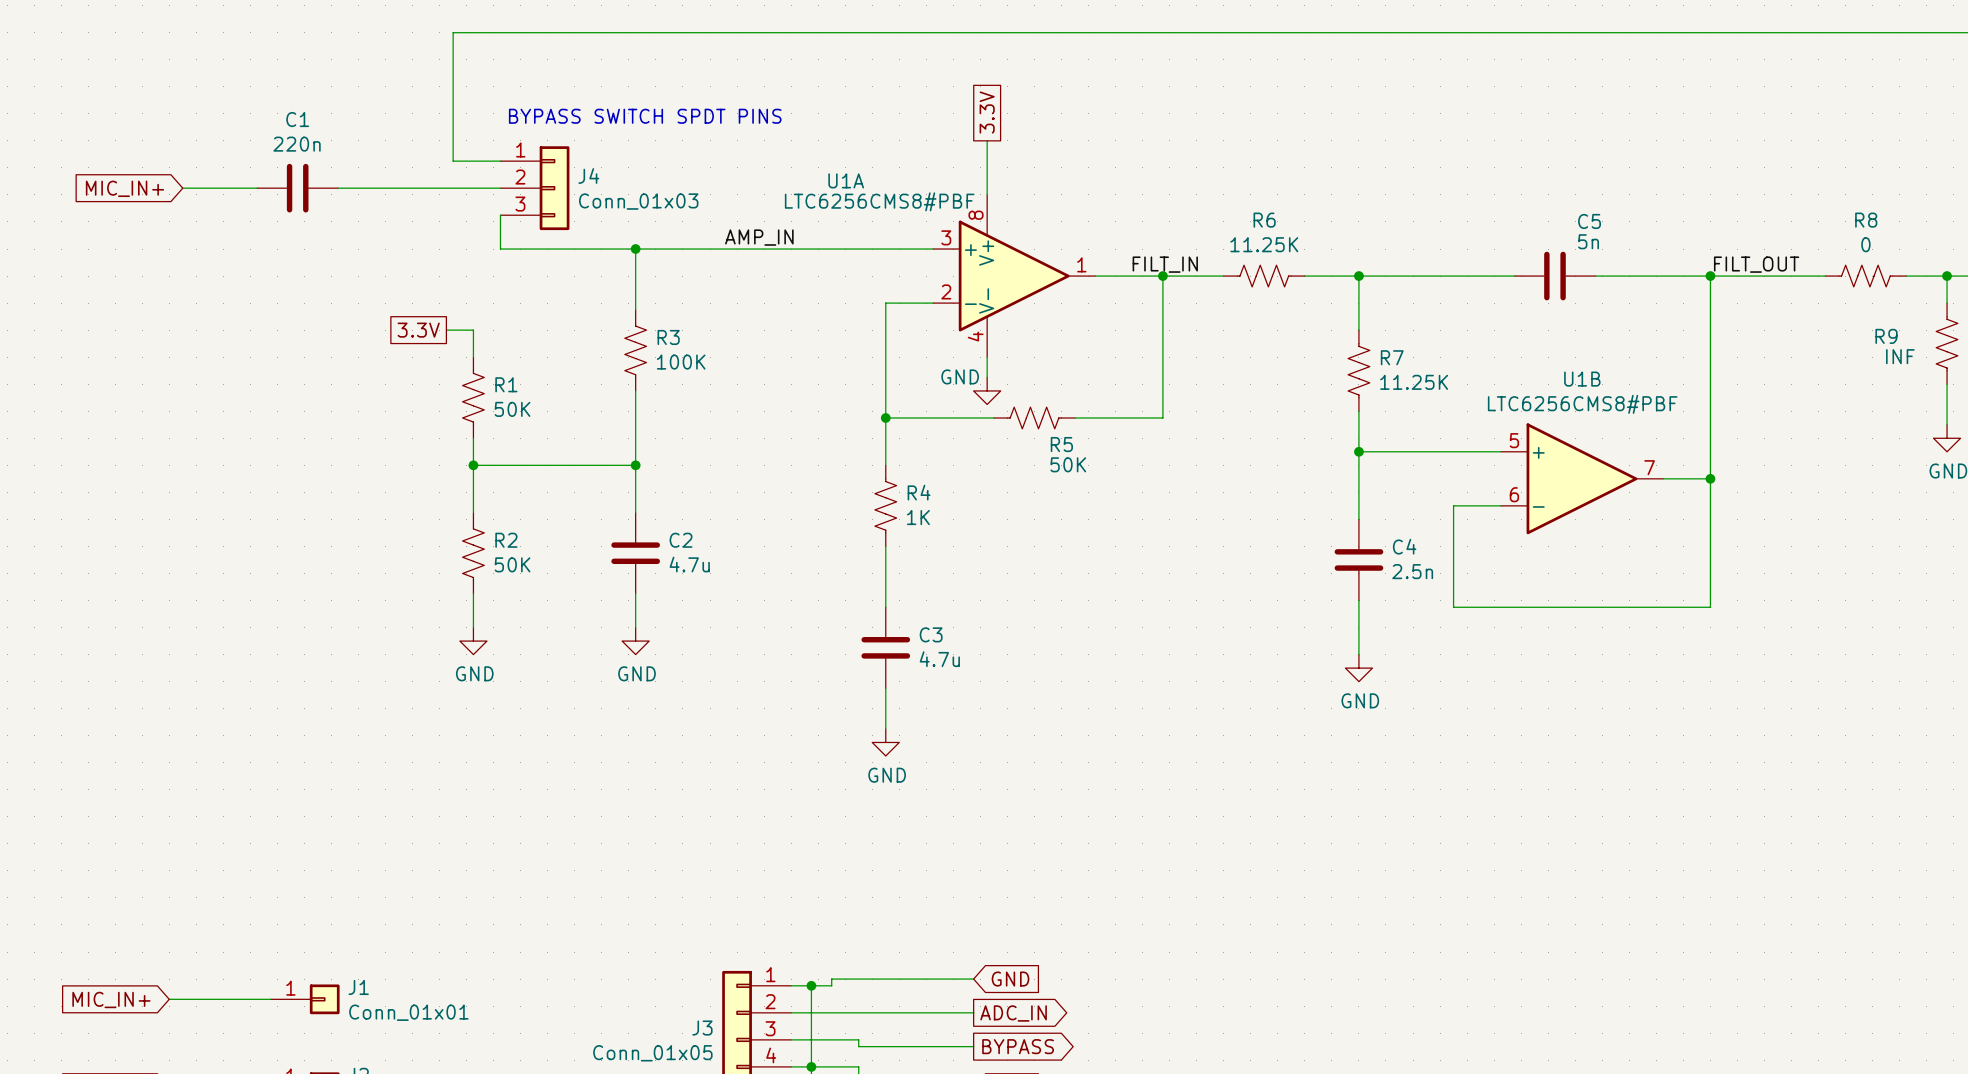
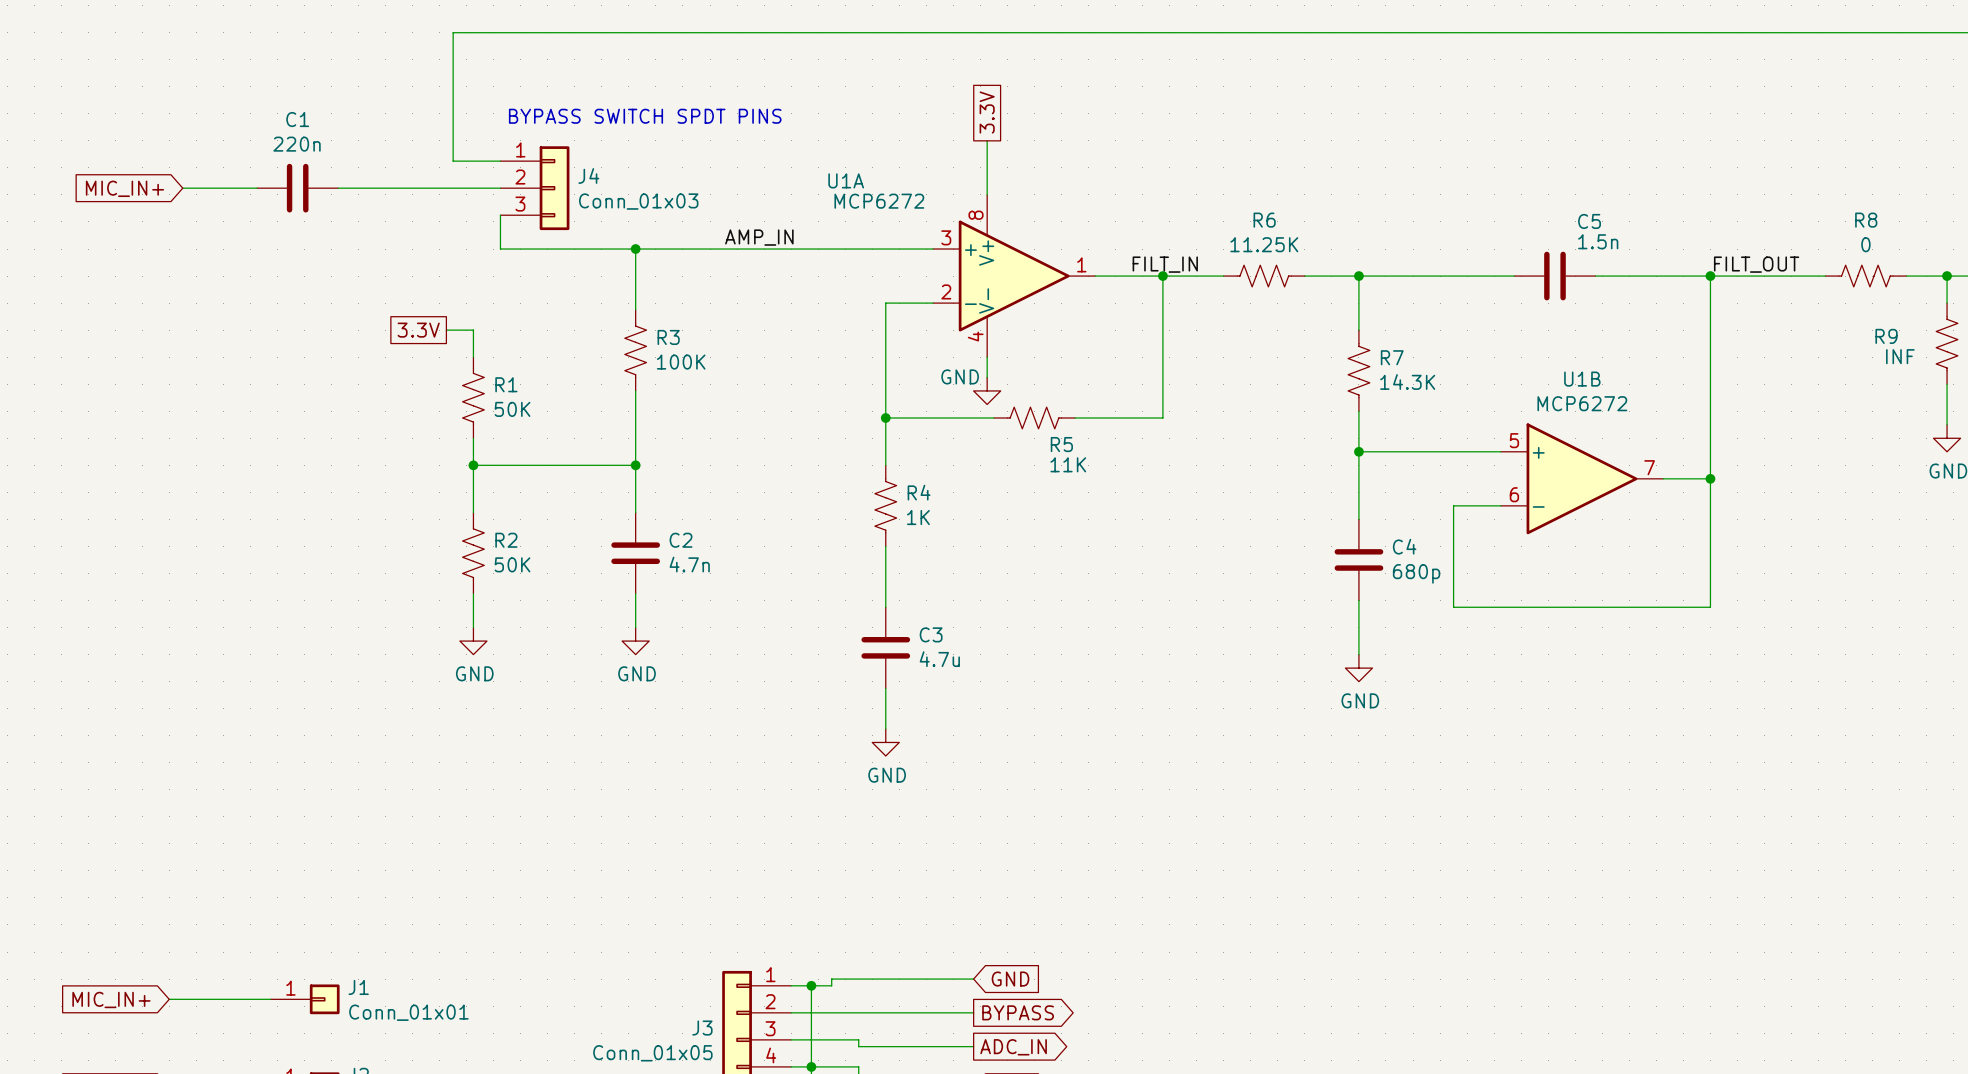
U1A value: LTC6256CMS8#PBF (879, 201) -> MCP6272 (879, 201)
C5 value: 5n (1588, 241) -> 1.5n (1598, 241)
R7 value: 11.25K (1414, 382) -> 14.3K (1407, 382)
U1B value: LTC6256CMS8#PBF (1582, 404) -> MCP6272 (1582, 403)
R5 value: 50K (1068, 464) -> 11K (1068, 464)
C2 value: 4.7u (689, 564) -> 4.7n (689, 564)
C4 value: 2.5n (1412, 571) -> 680p (1416, 573)
global label: ADC_IN (1013, 1013) -> BYPASS (1018, 1012)
global label: BYPASS (1018, 1046) -> ADC_IN (1013, 1047)

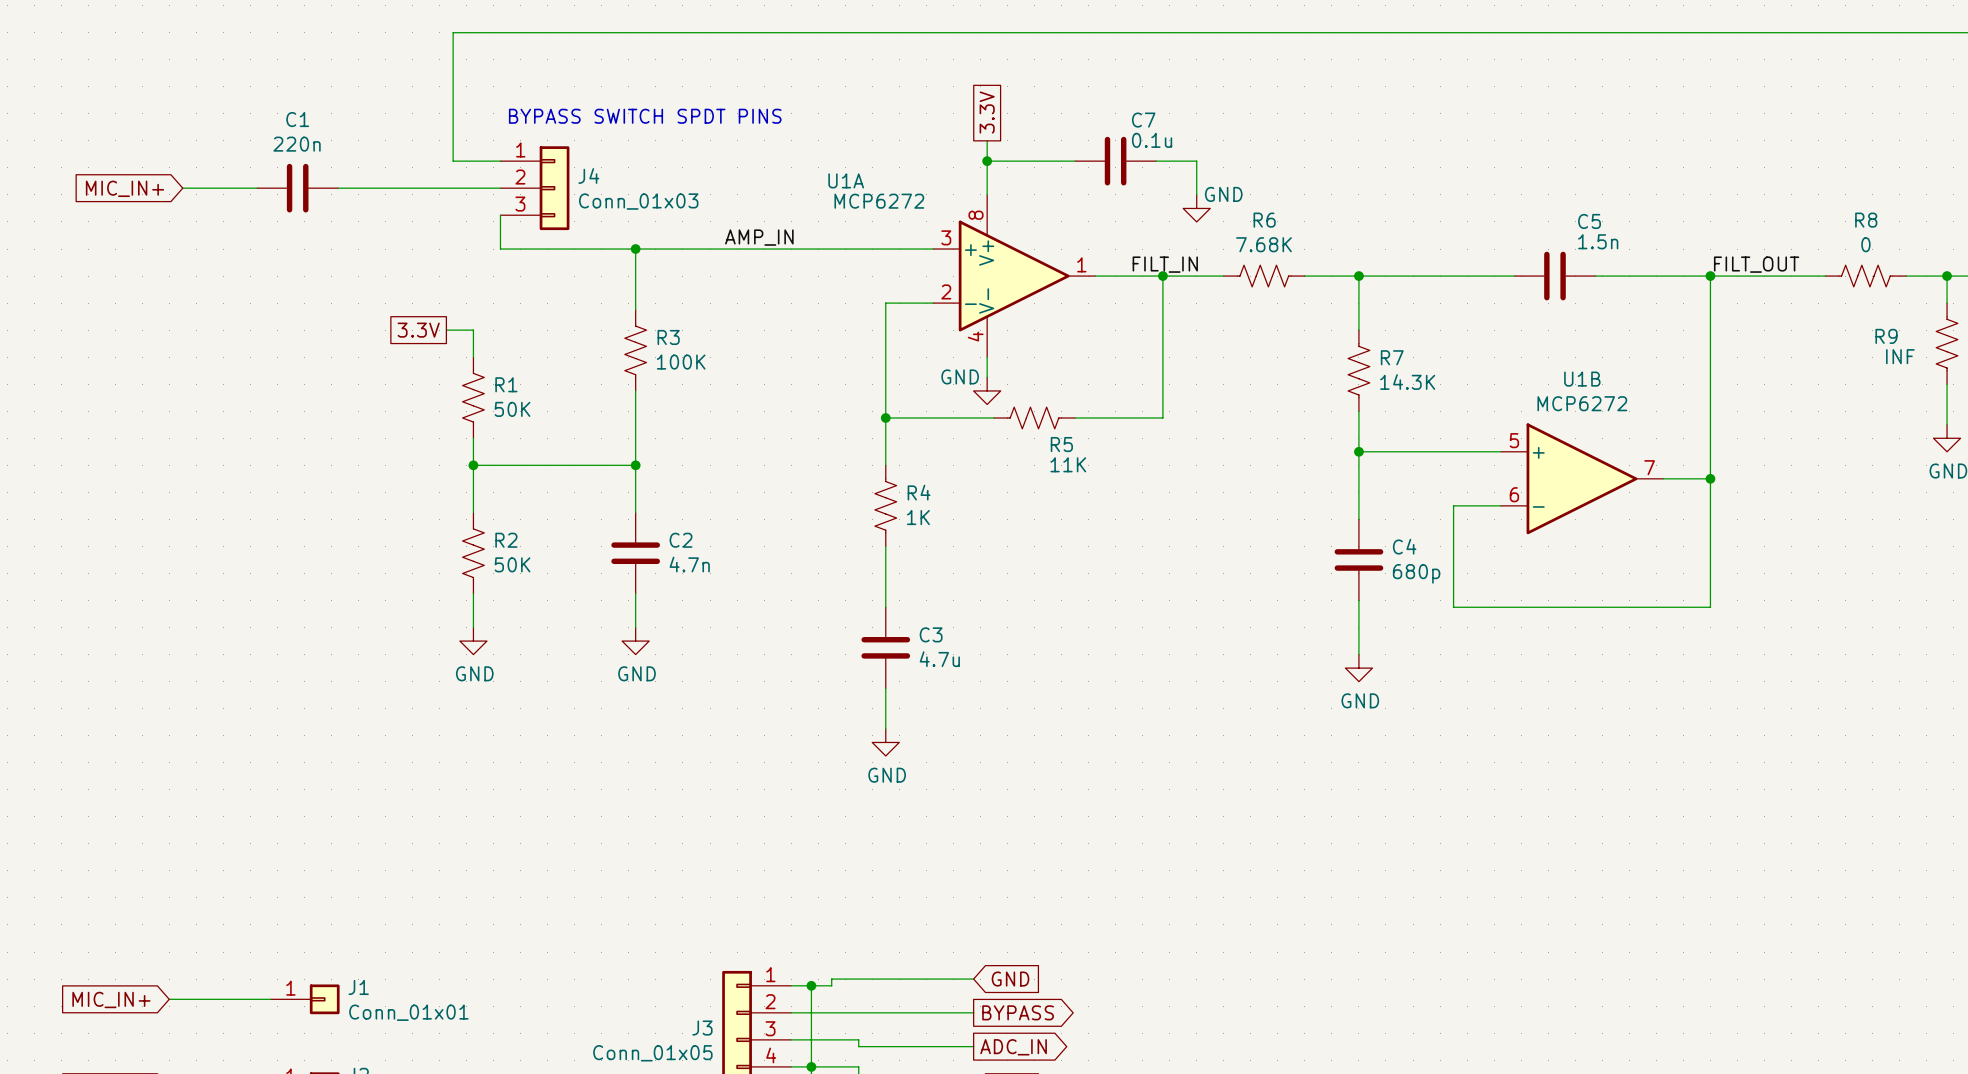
wire: none -> (987, 161) (1075, 161)
junction: none -> (987, 161)
C7: none -> 0.1u (1115, 161)
wire: none -> (1156, 161) (1196, 161) (1196, 194)
power symbol: none -> GND (1196, 208)
R6 value: 11.25K (1264, 244) -> 7.68K (1263, 244)

